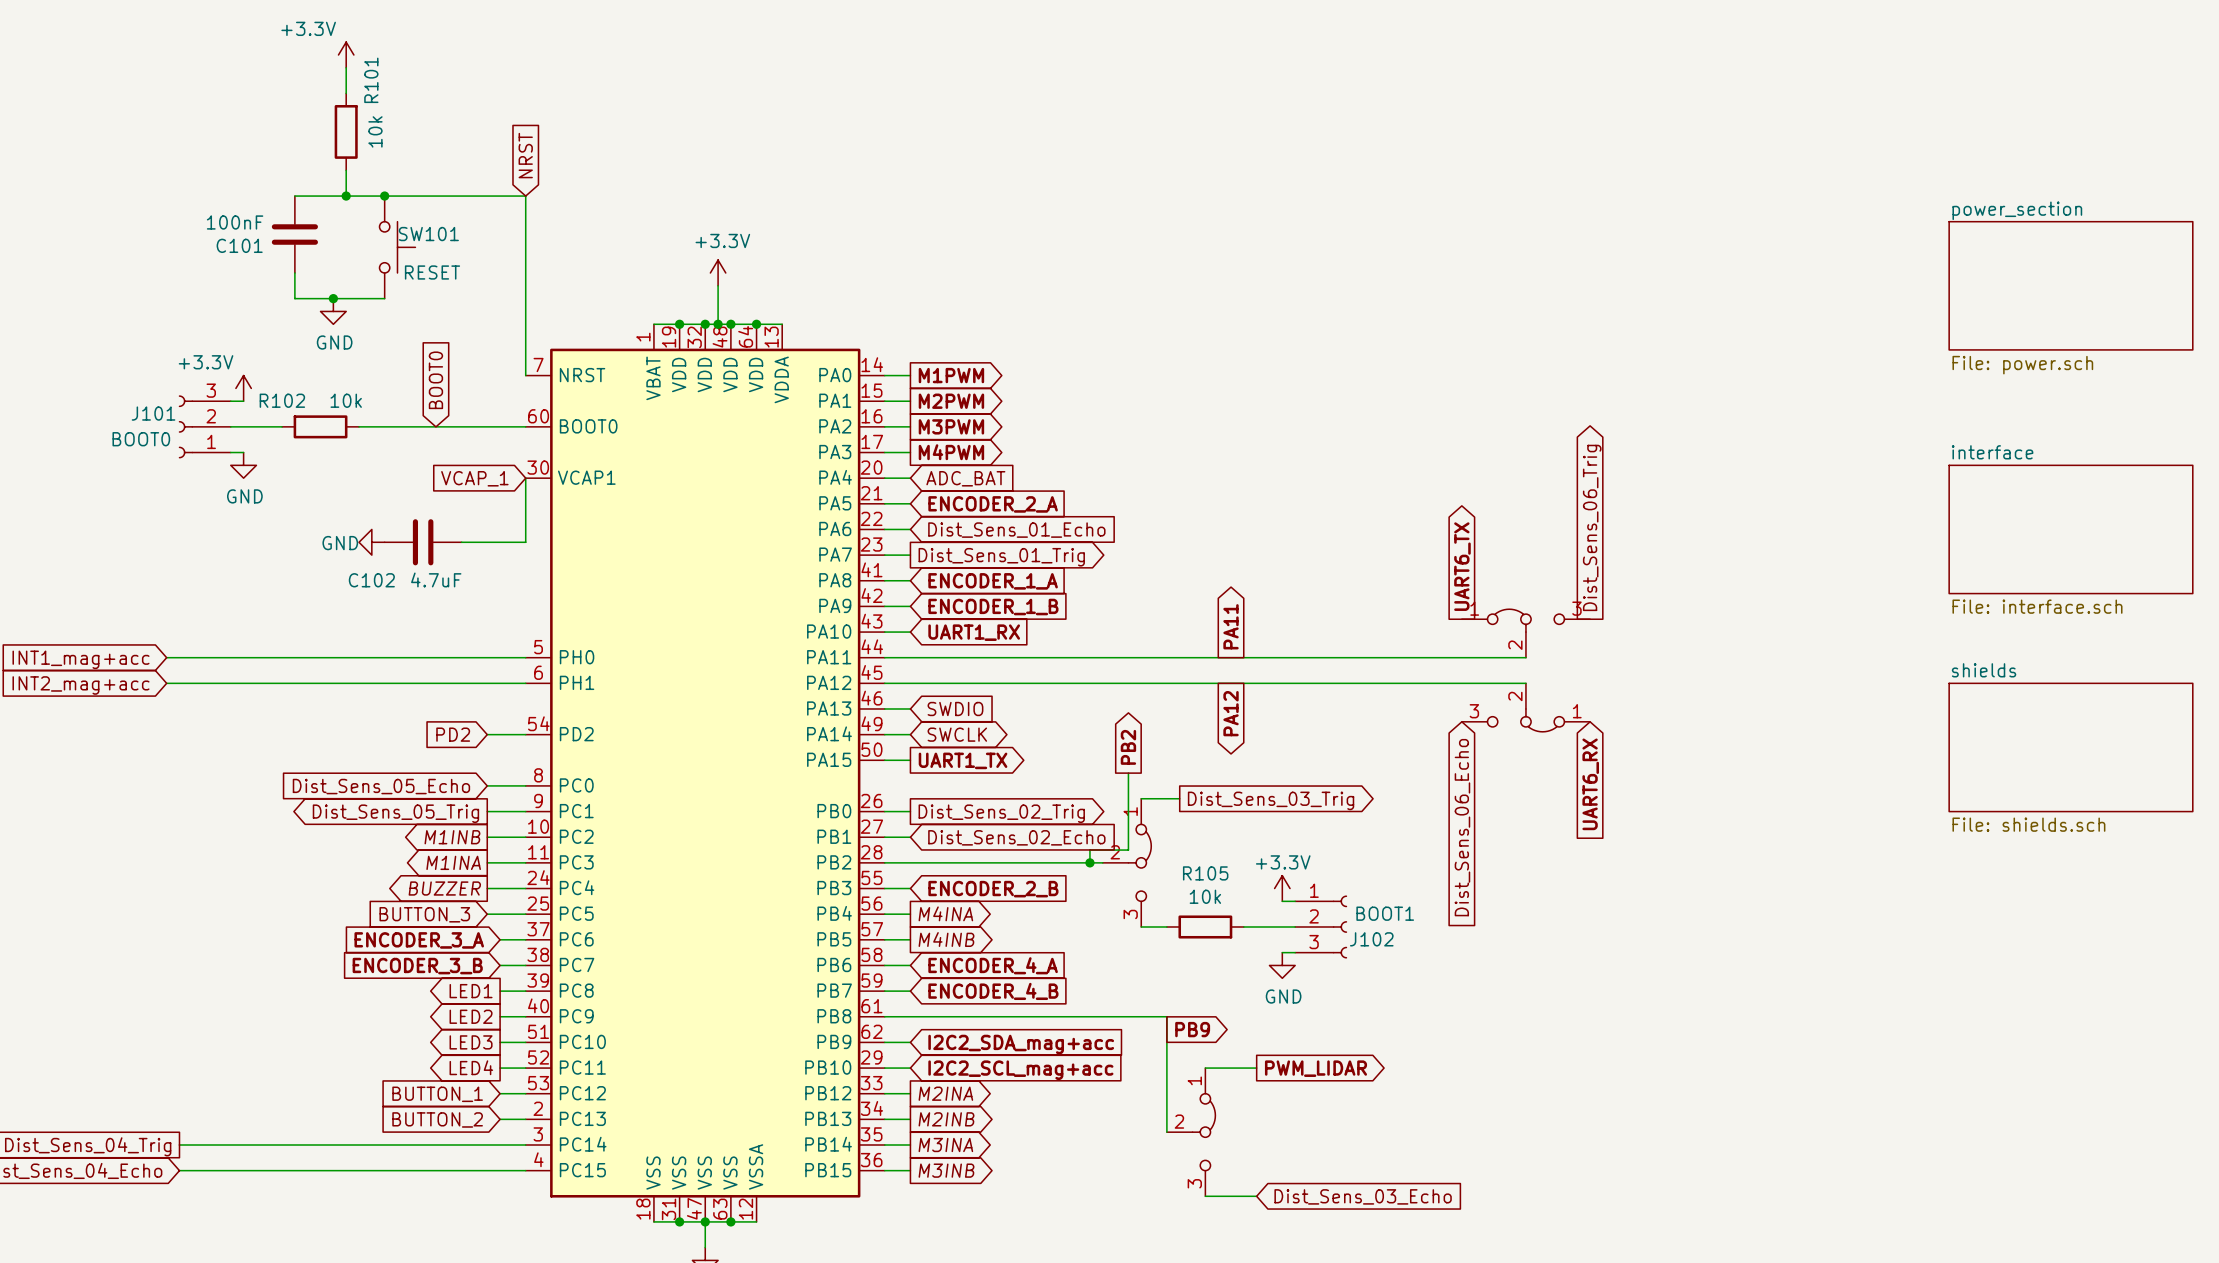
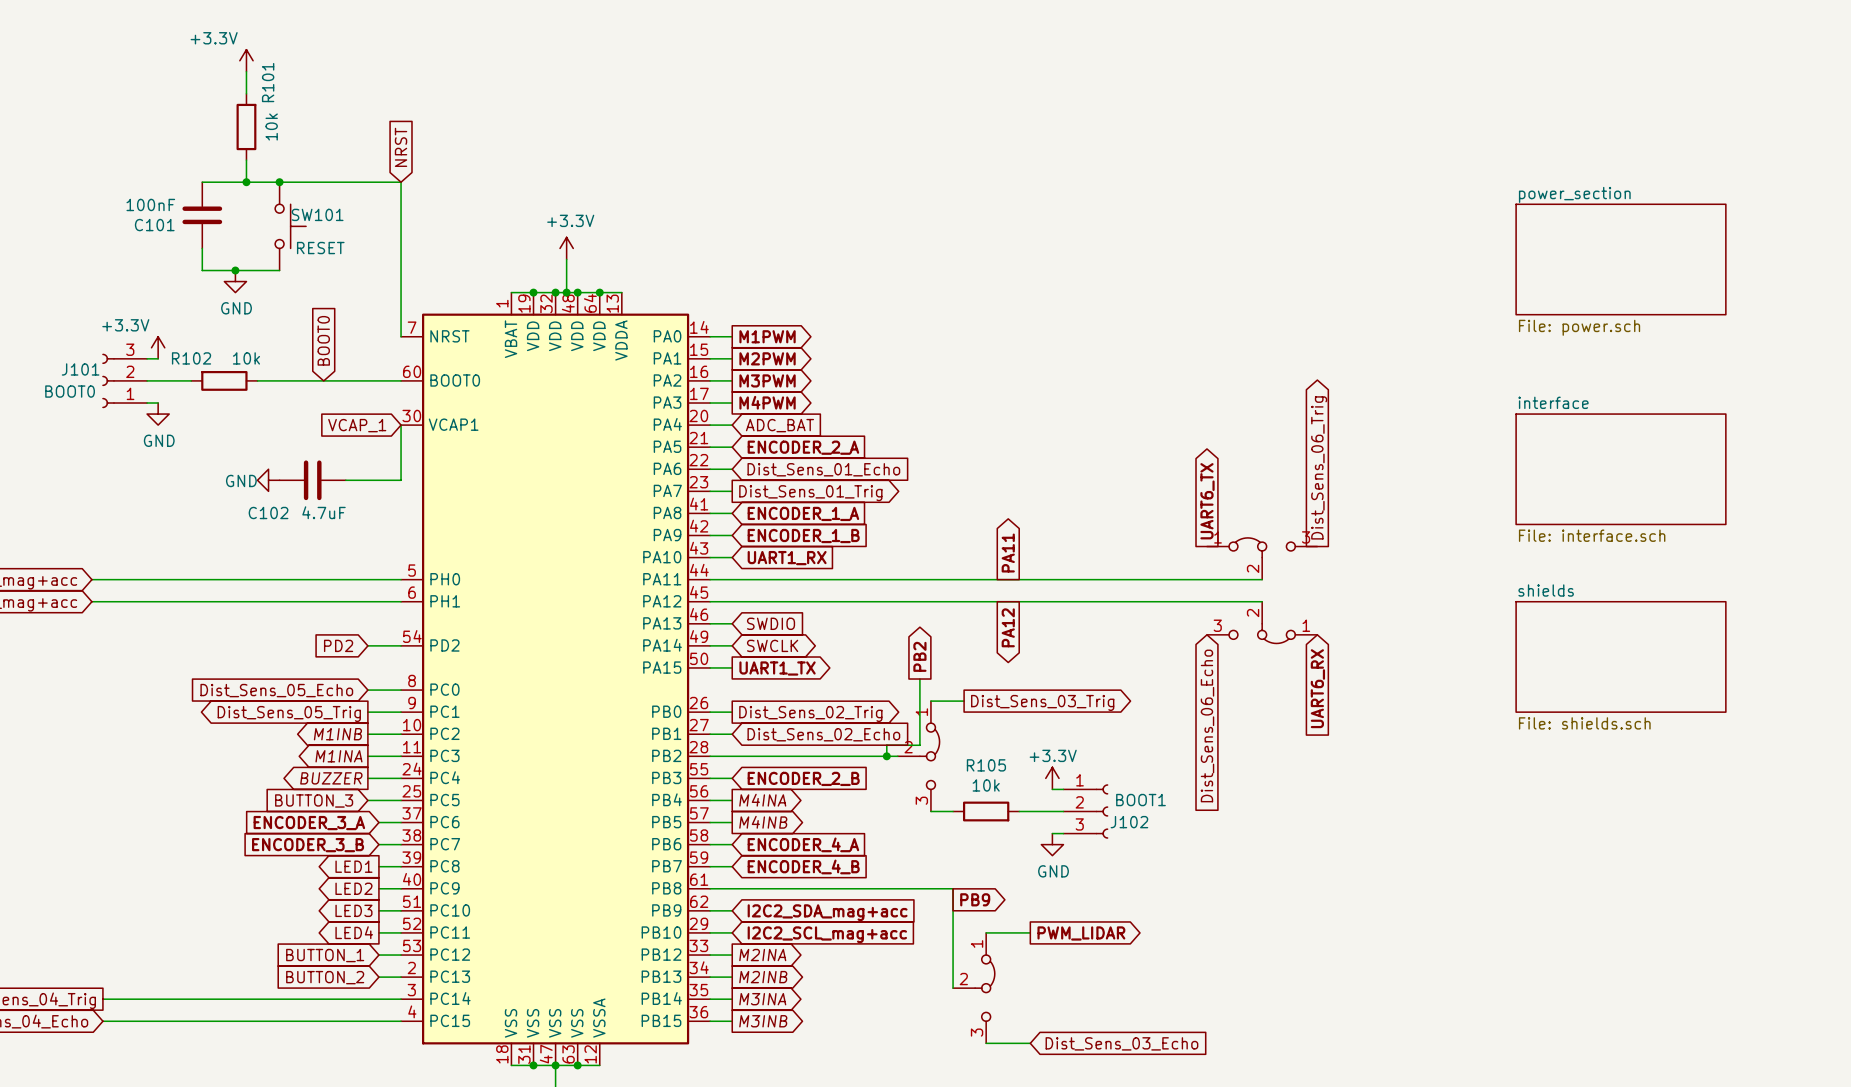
sheet power_section position: (2070, 285) -> (1620, 259)
sheet interface position: (2070, 529) -> (1620, 469)
sheet shields position: (2070, 747) -> (1620, 656)

